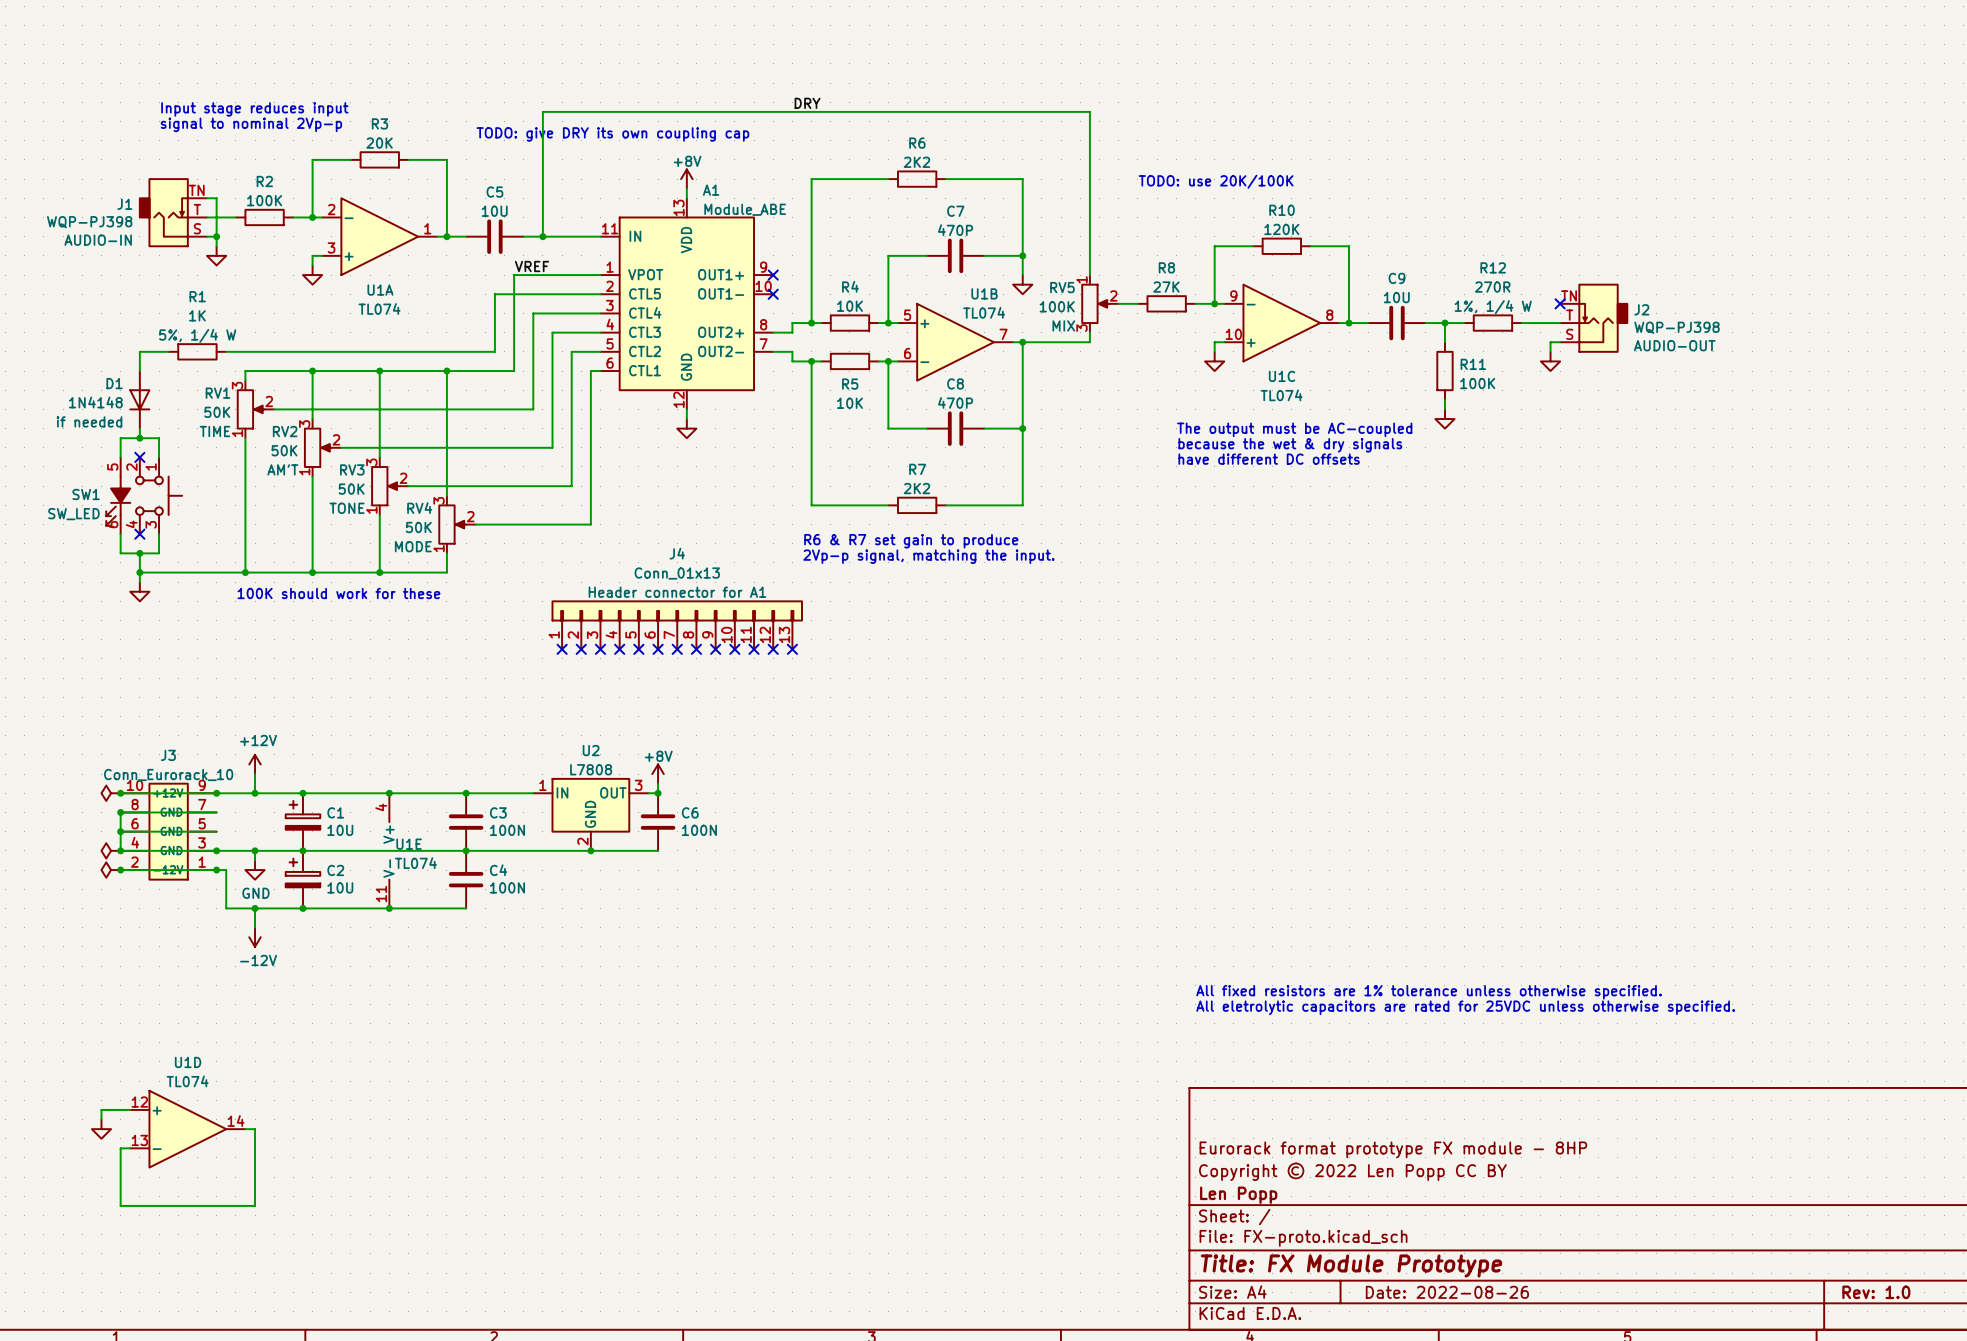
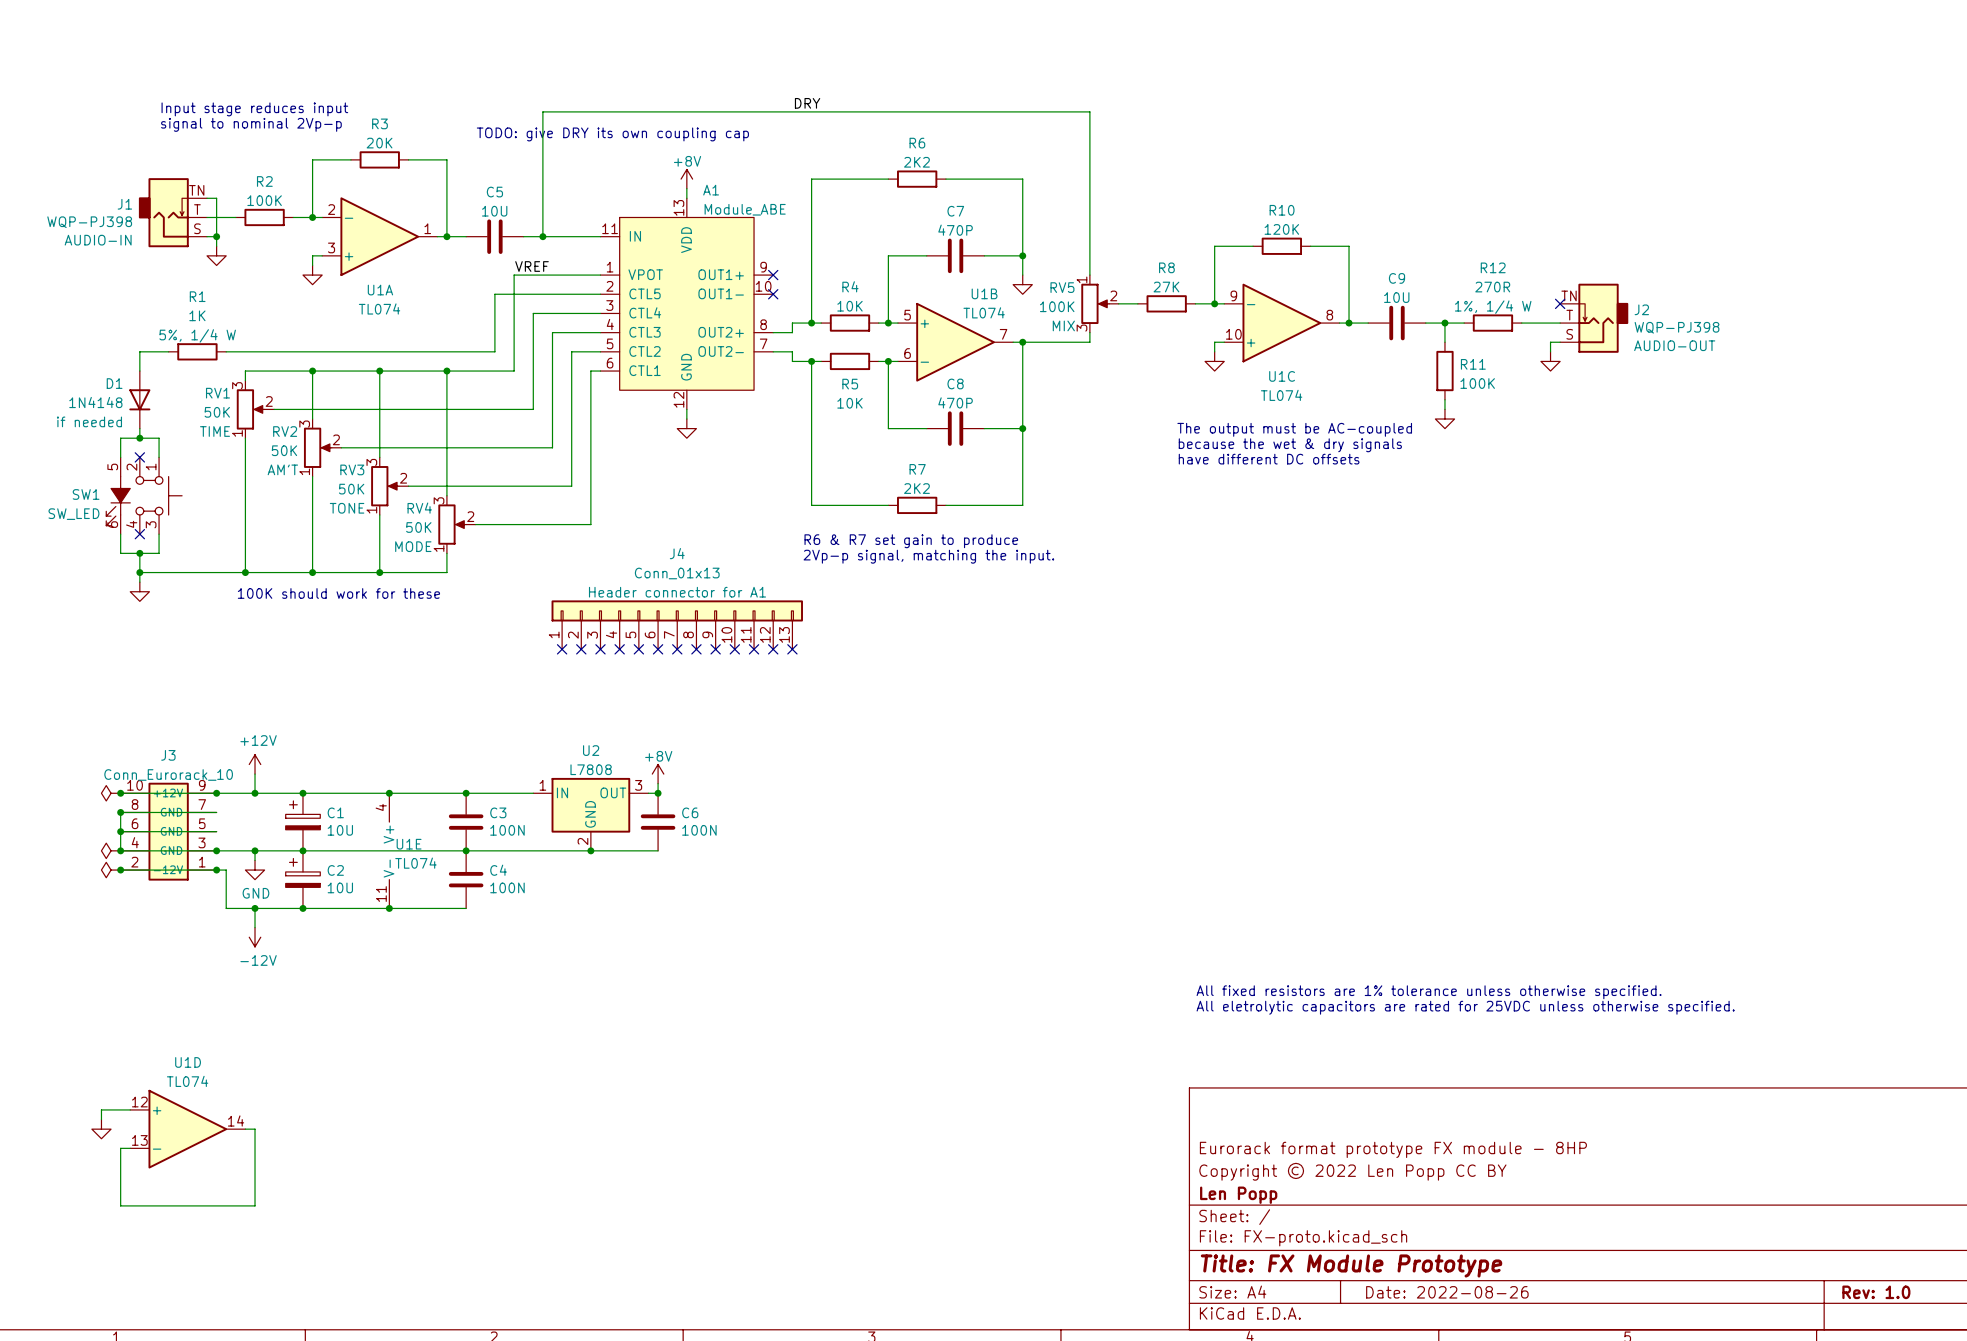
text: TODO: use 20K/100K (1216, 181) -> none

